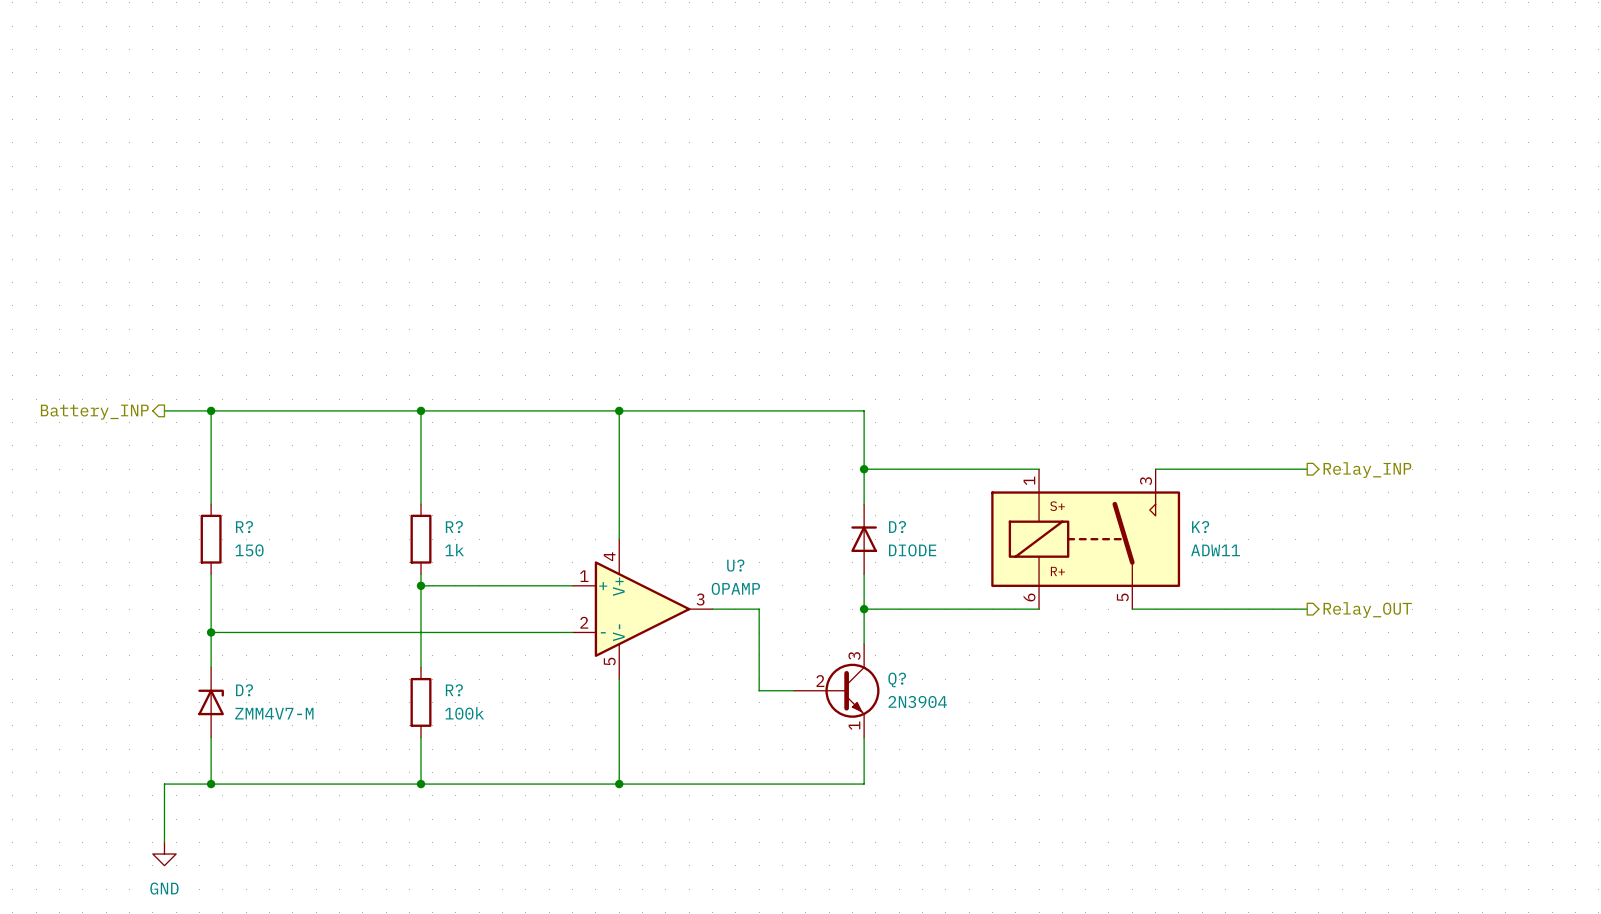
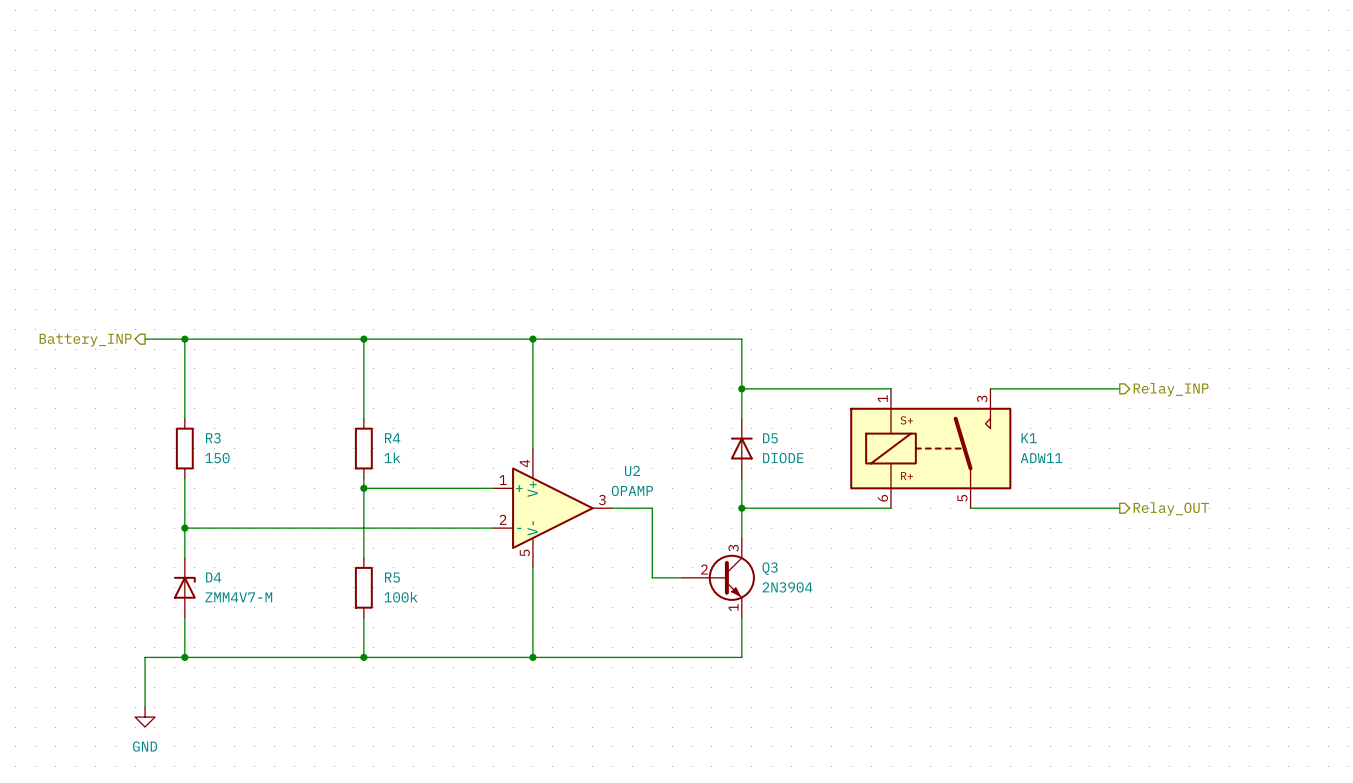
R? name: R? (244, 527) -> R3 (213, 438)
R? name: R? (454, 527) -> R4 (392, 438)
D? name: D? (897, 527) -> D5 (770, 438)
K? name: K? (1200, 527) -> K1 (1029, 438)
U? name: U? (735, 565) -> U2 (632, 471)
Q? name: Q? (897, 679) -> Q3 (770, 568)
D? name: D? (244, 690) -> D4 (213, 577)
R? name: R? (454, 690) -> R5 (392, 577)

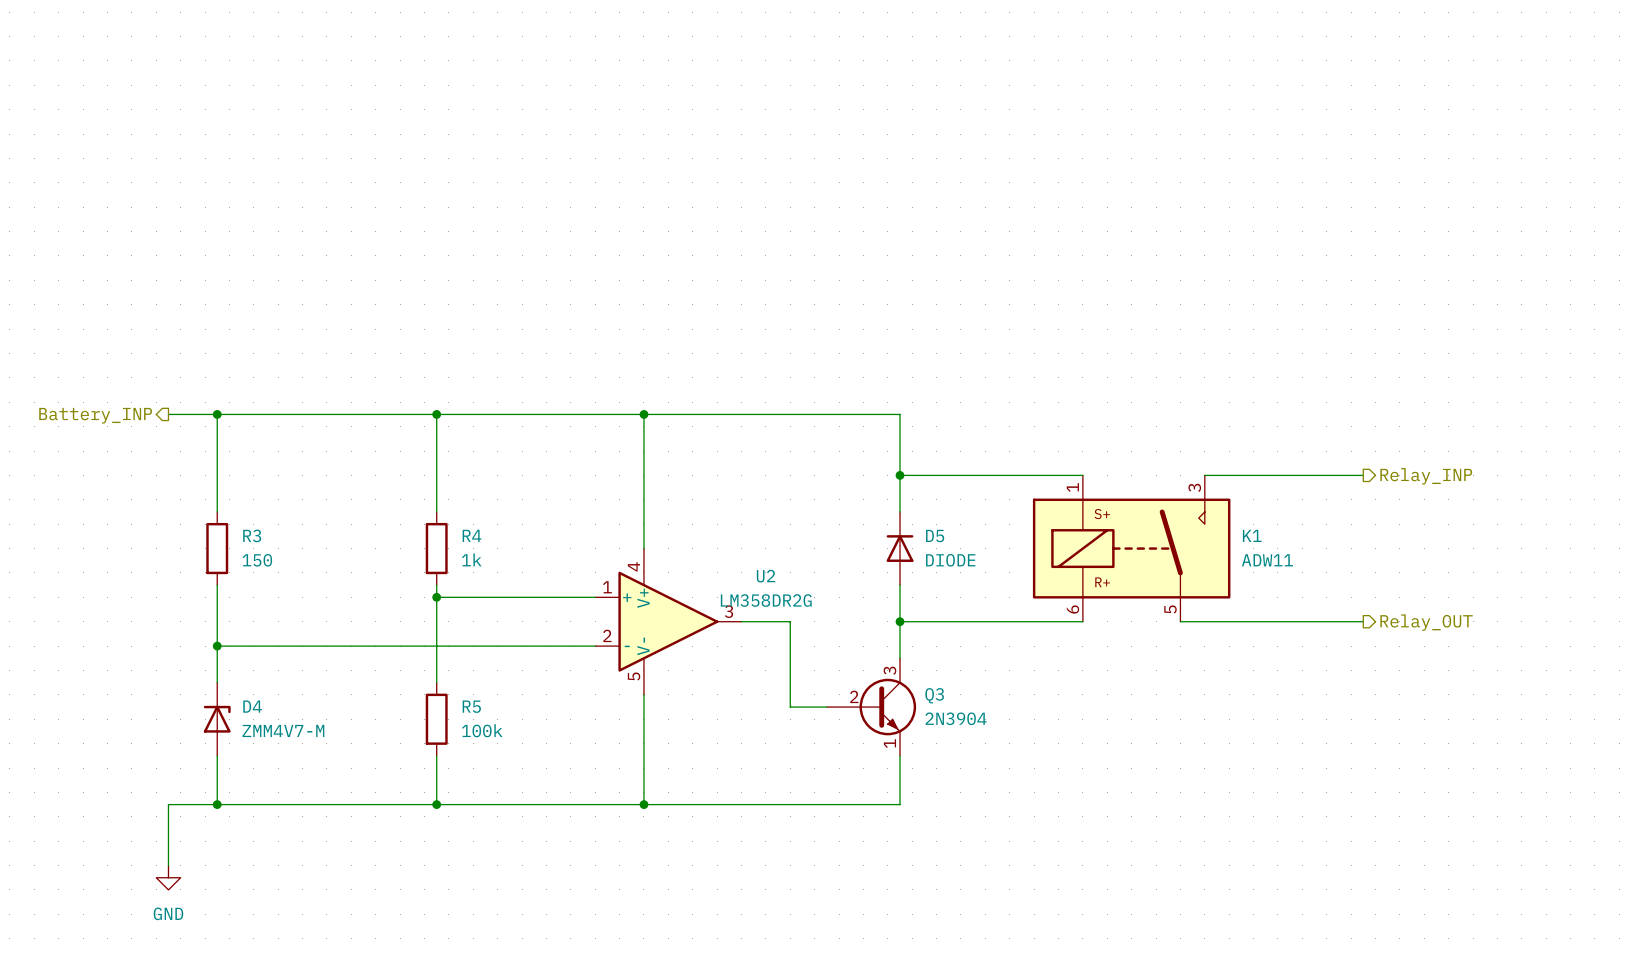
U2 value: OPAMP (632, 490) -> LM358DR2G (766, 600)

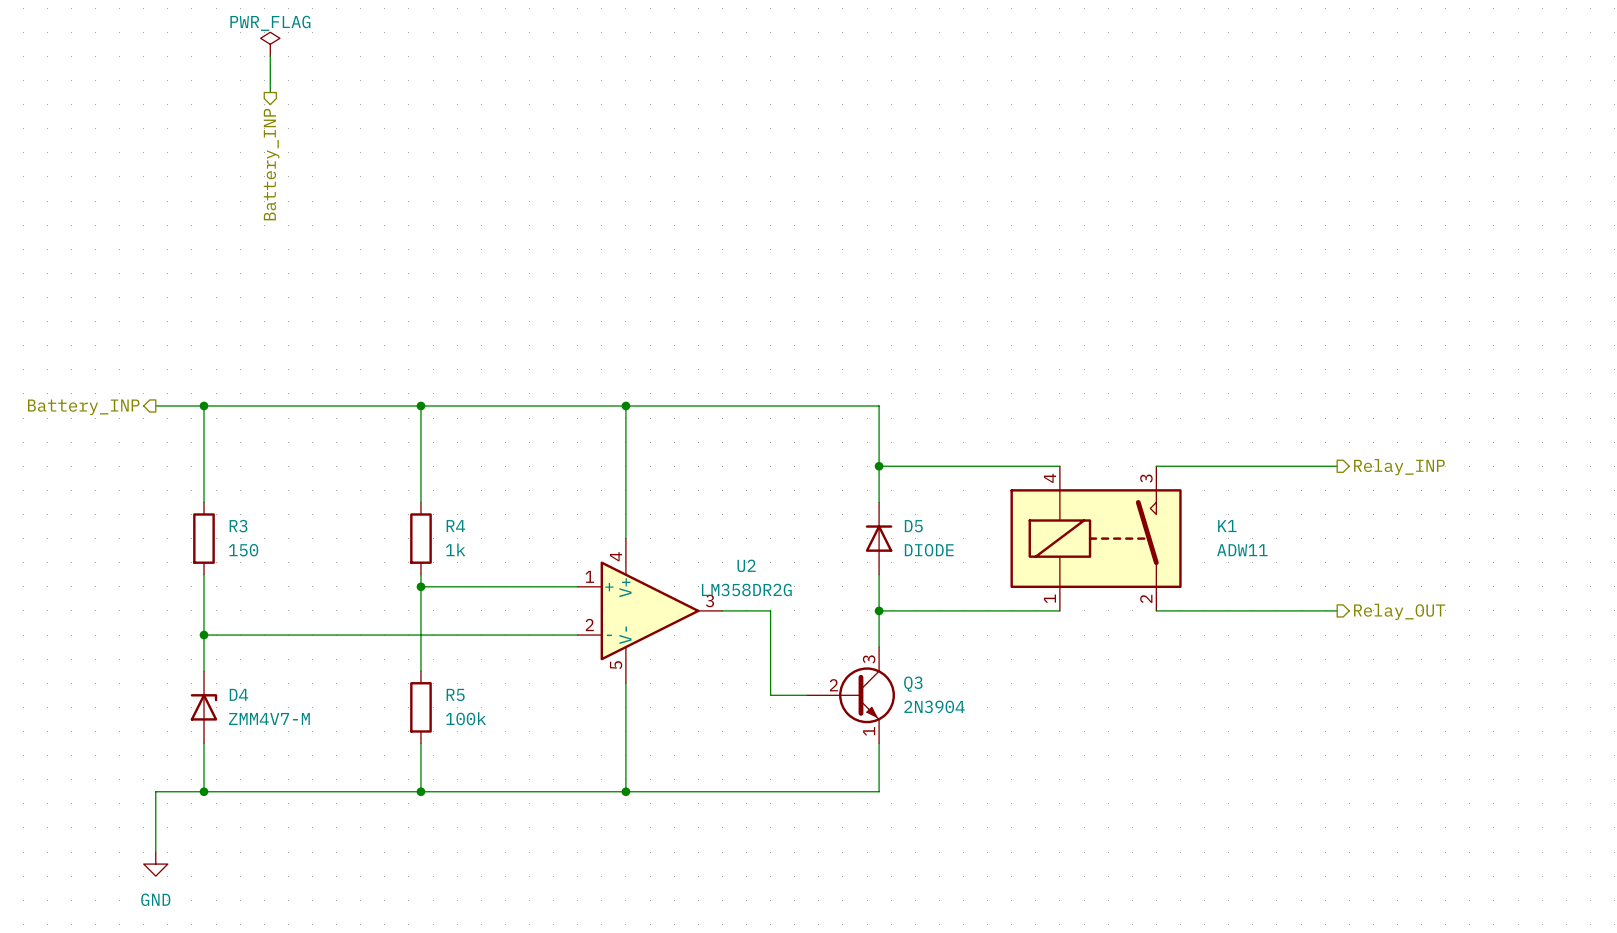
power symbol: none -> PWR_FLAG (270, 44)
wire: none -> (270, 56) (270, 92)
hierarchical label: none -> Battery_INP (271, 164)
K1 symbol: [1032, 475, 1231, 622] -> [1010, 466, 1182, 611]
wire: none -> (1156, 466) (1180, 466)

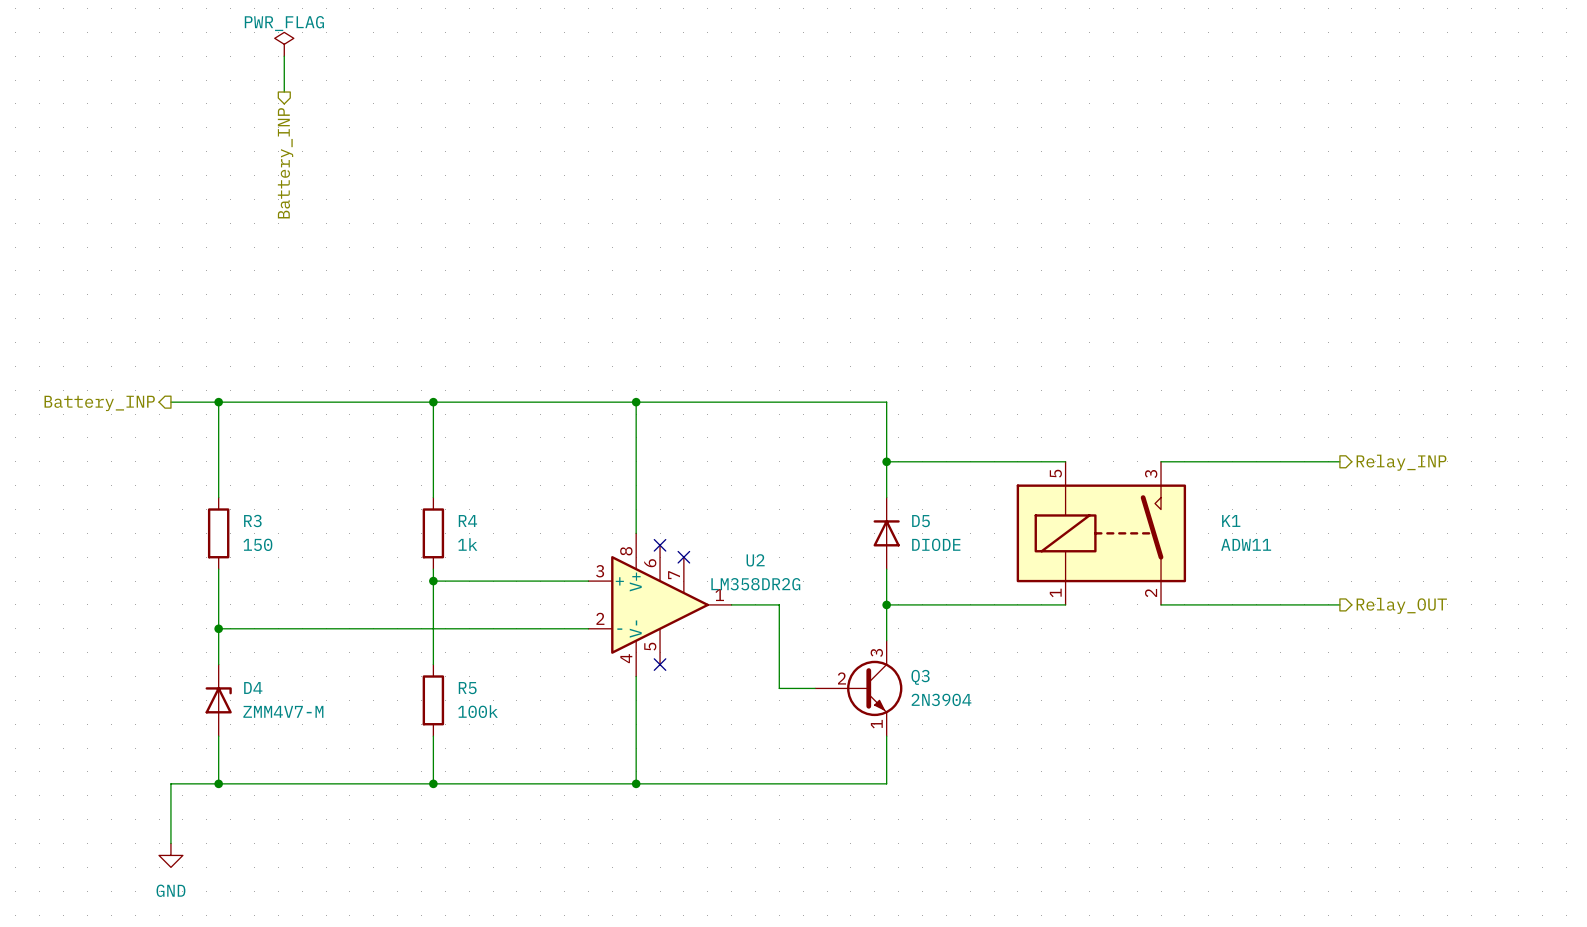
K1 pin number: 4 (1049, 478) -> 5 (1055, 473)
U2 symbol: [577, 538, 723, 684] -> [588, 533, 732, 677]
no-connect mark: none -> (660, 545)
no-connect mark: none -> (683, 557)
no-connect mark: none -> (660, 664)

